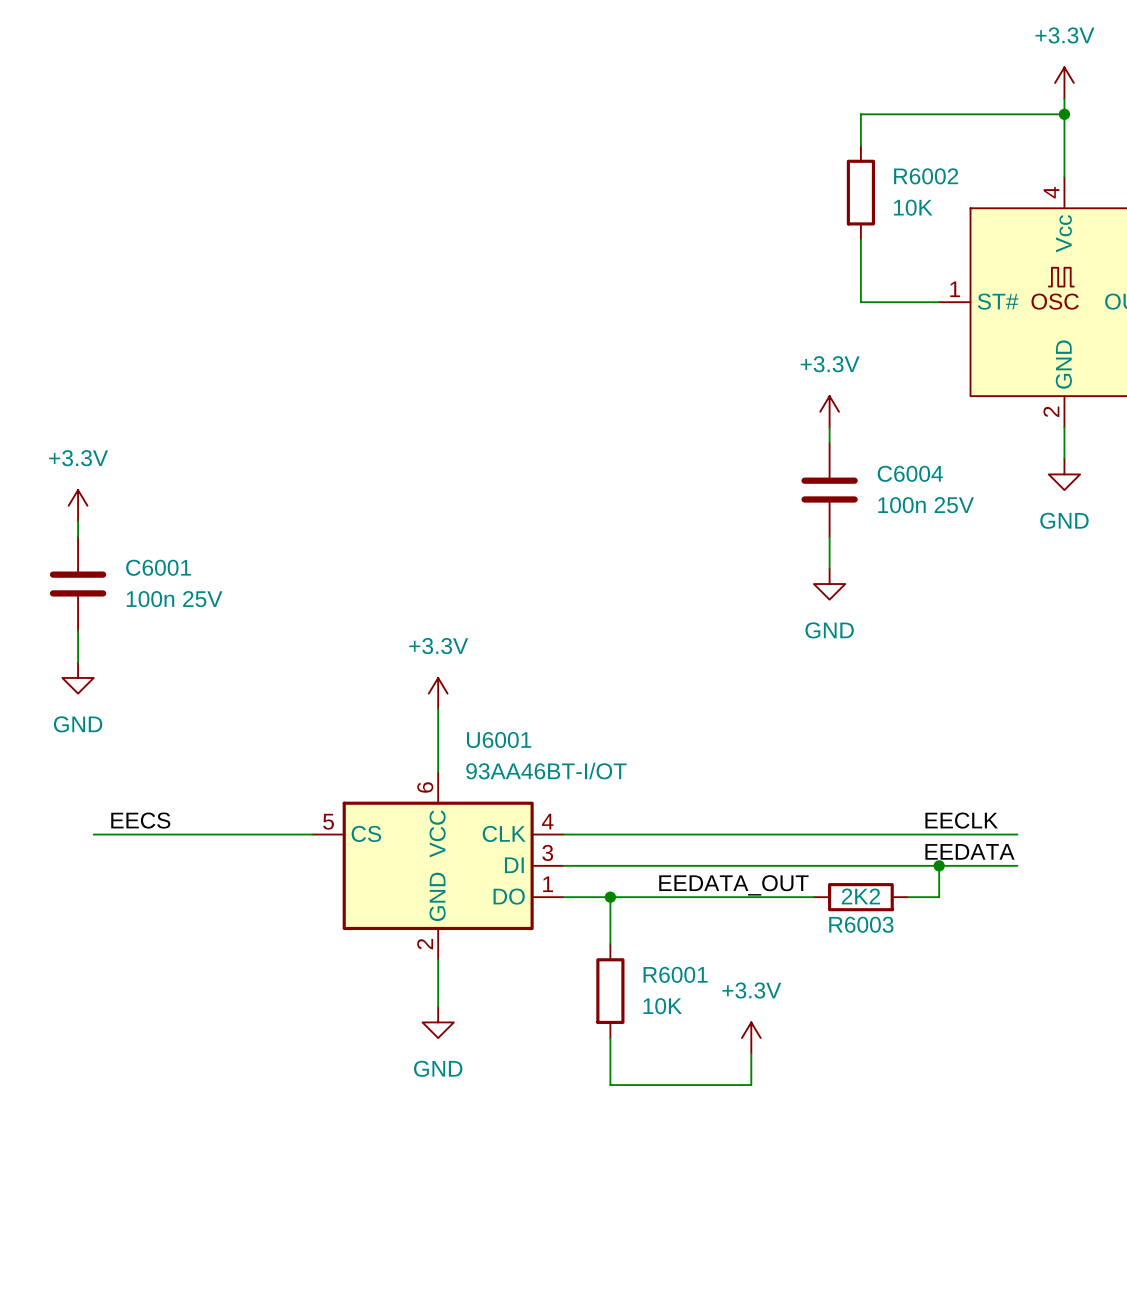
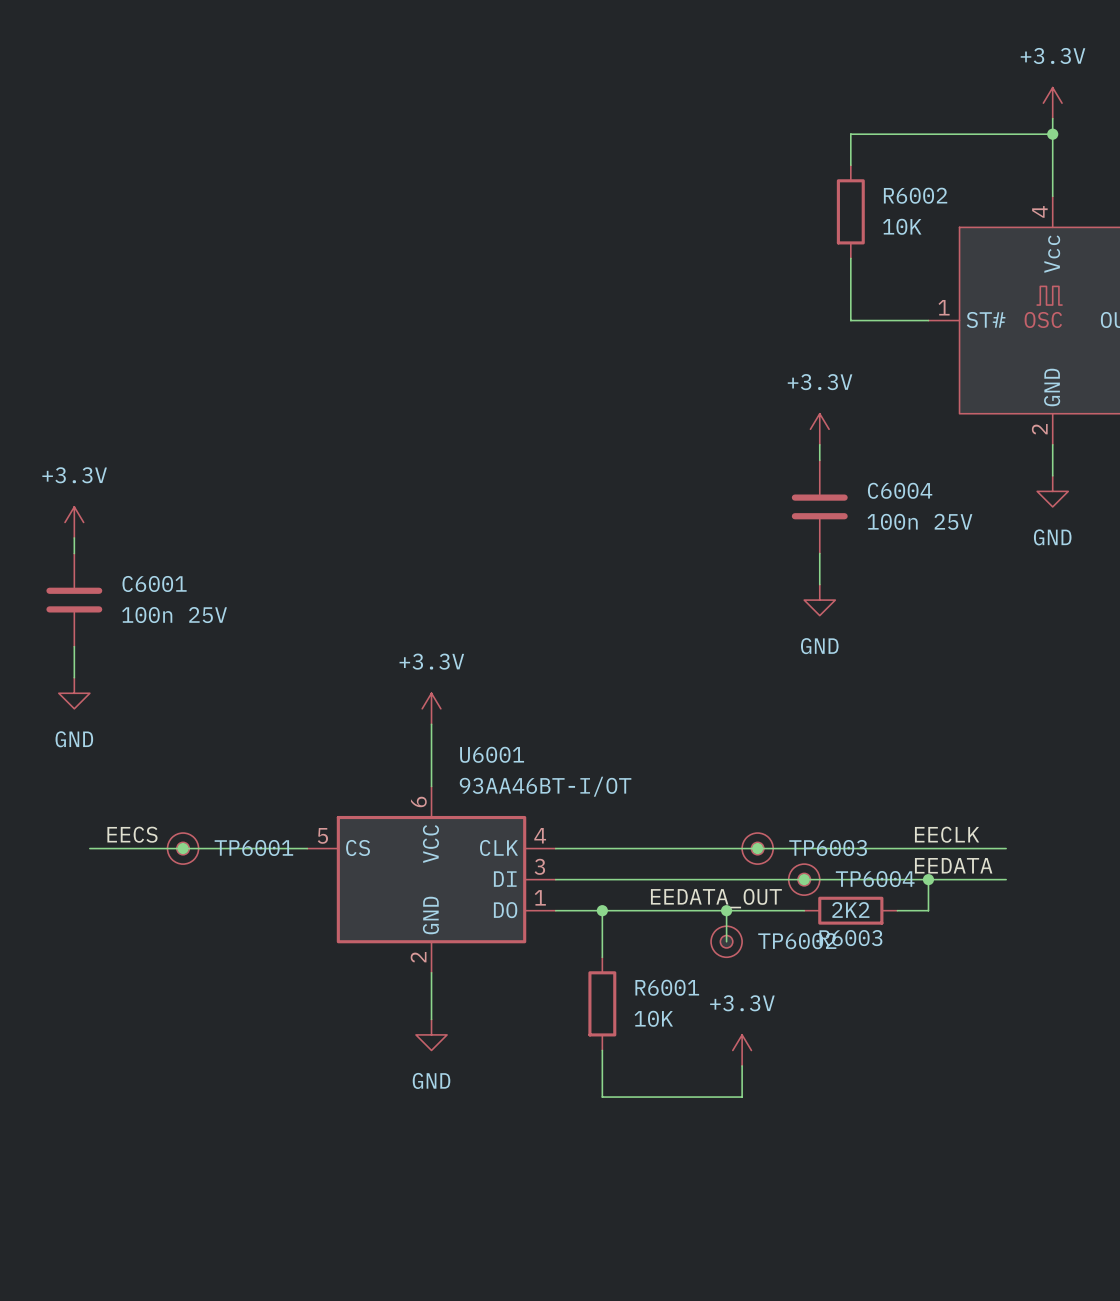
junction: none -> (183, 848)
TP6001: none -> (183, 848)
junction: none -> (757, 848)
TP6003: none -> (757, 848)
junction: none -> (804, 879)
TP6004: none -> (804, 879)
wire: none -> (726, 910) (726, 941)
junction: none -> (726, 910)
TP6002: none -> (726, 941)

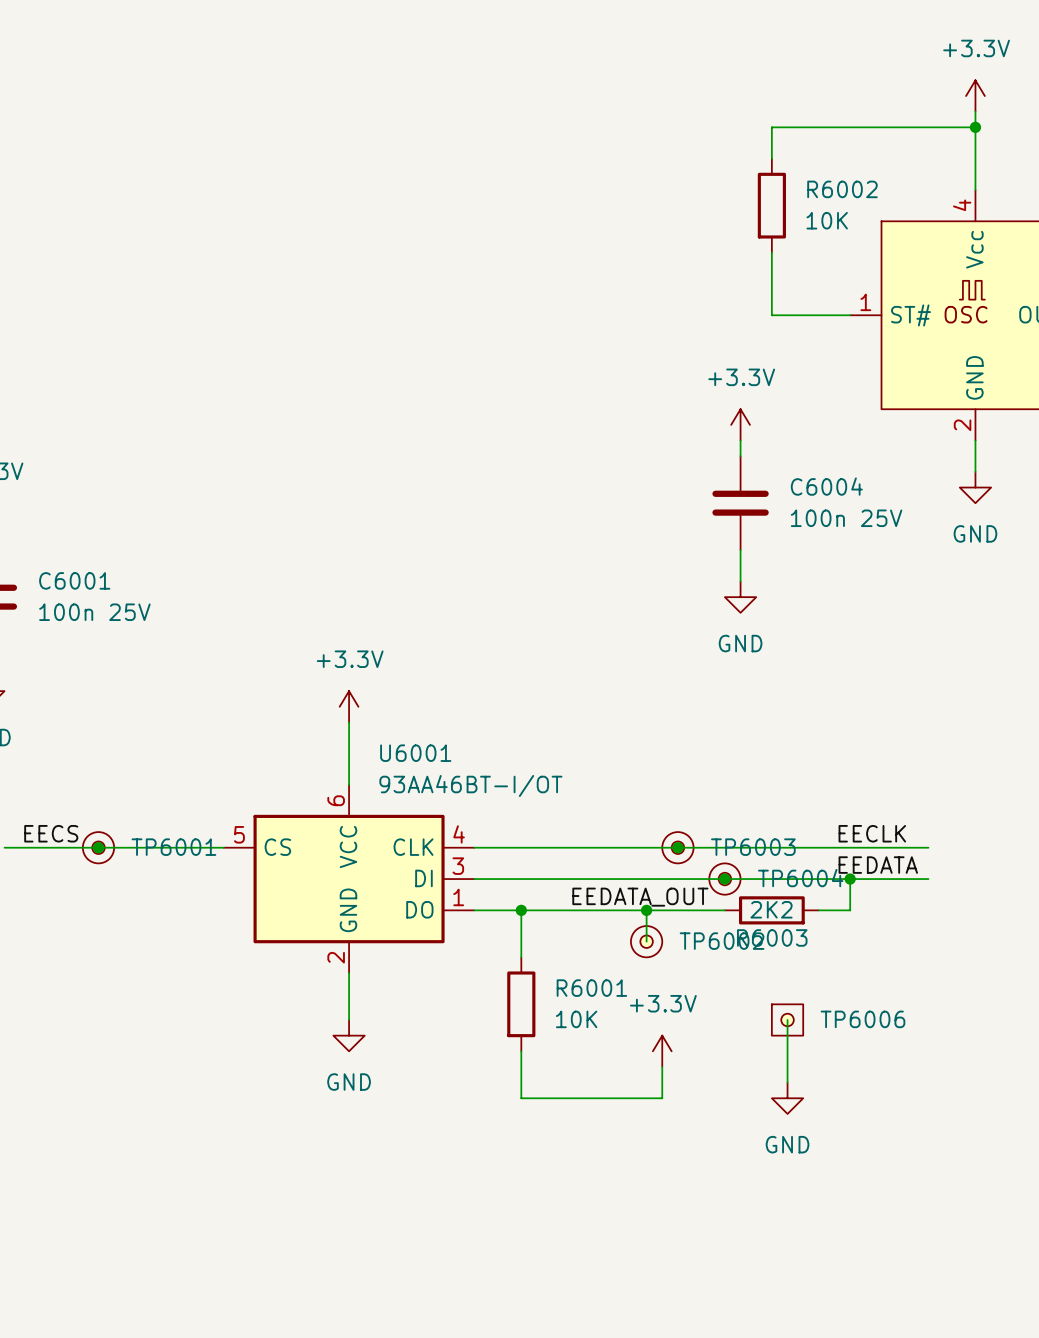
wire: none -> (787, 1019) (787, 1082)
TP6006: none -> (787, 1019)
power symbol: none -> GND (787, 1098)

